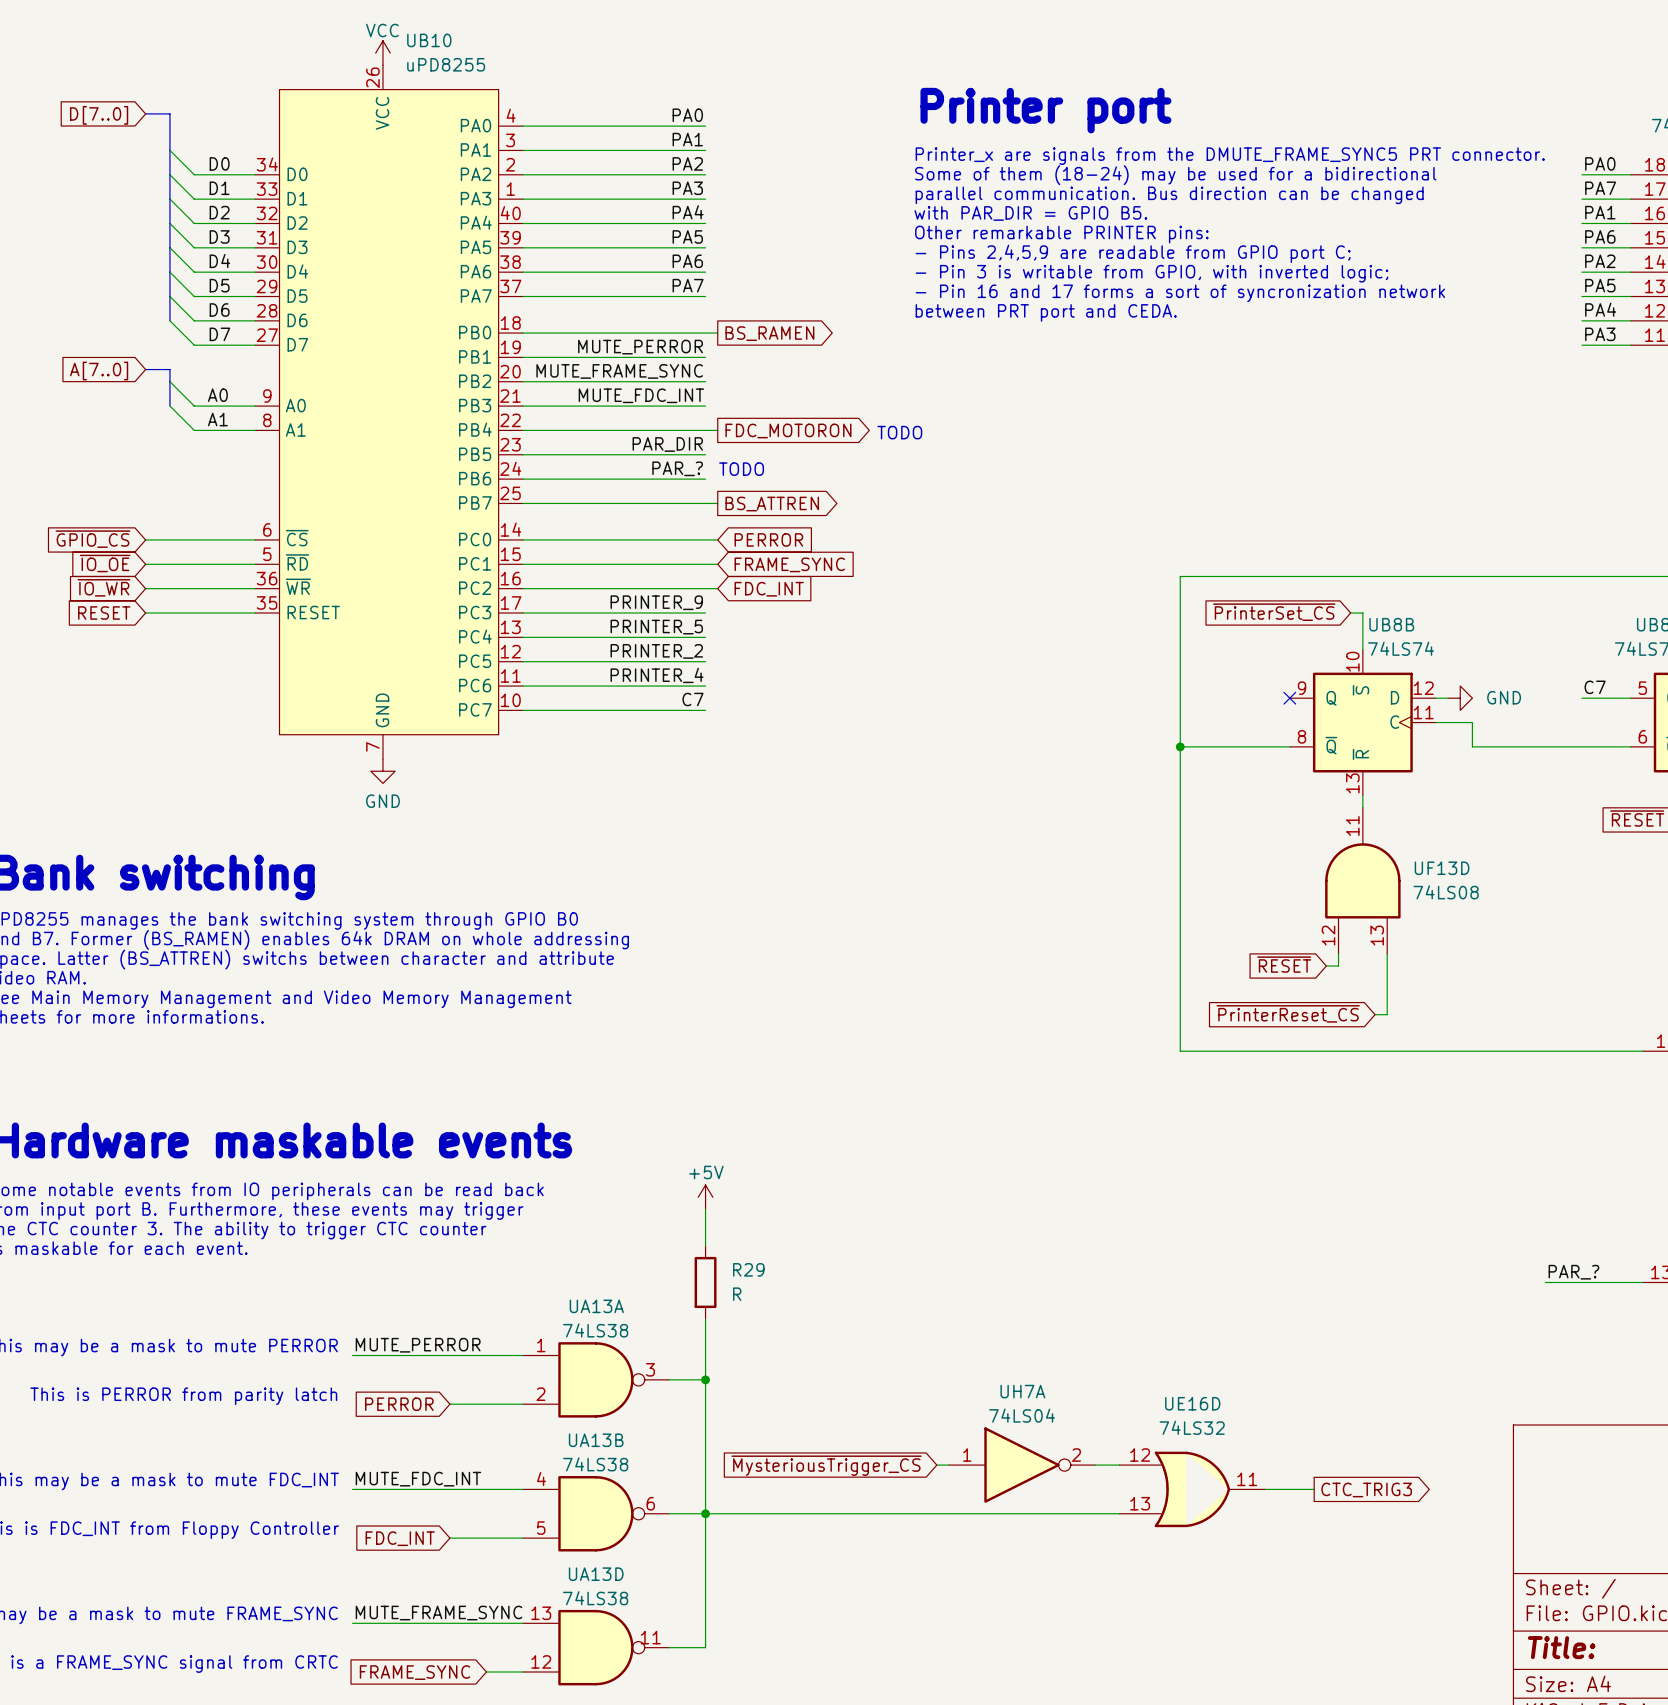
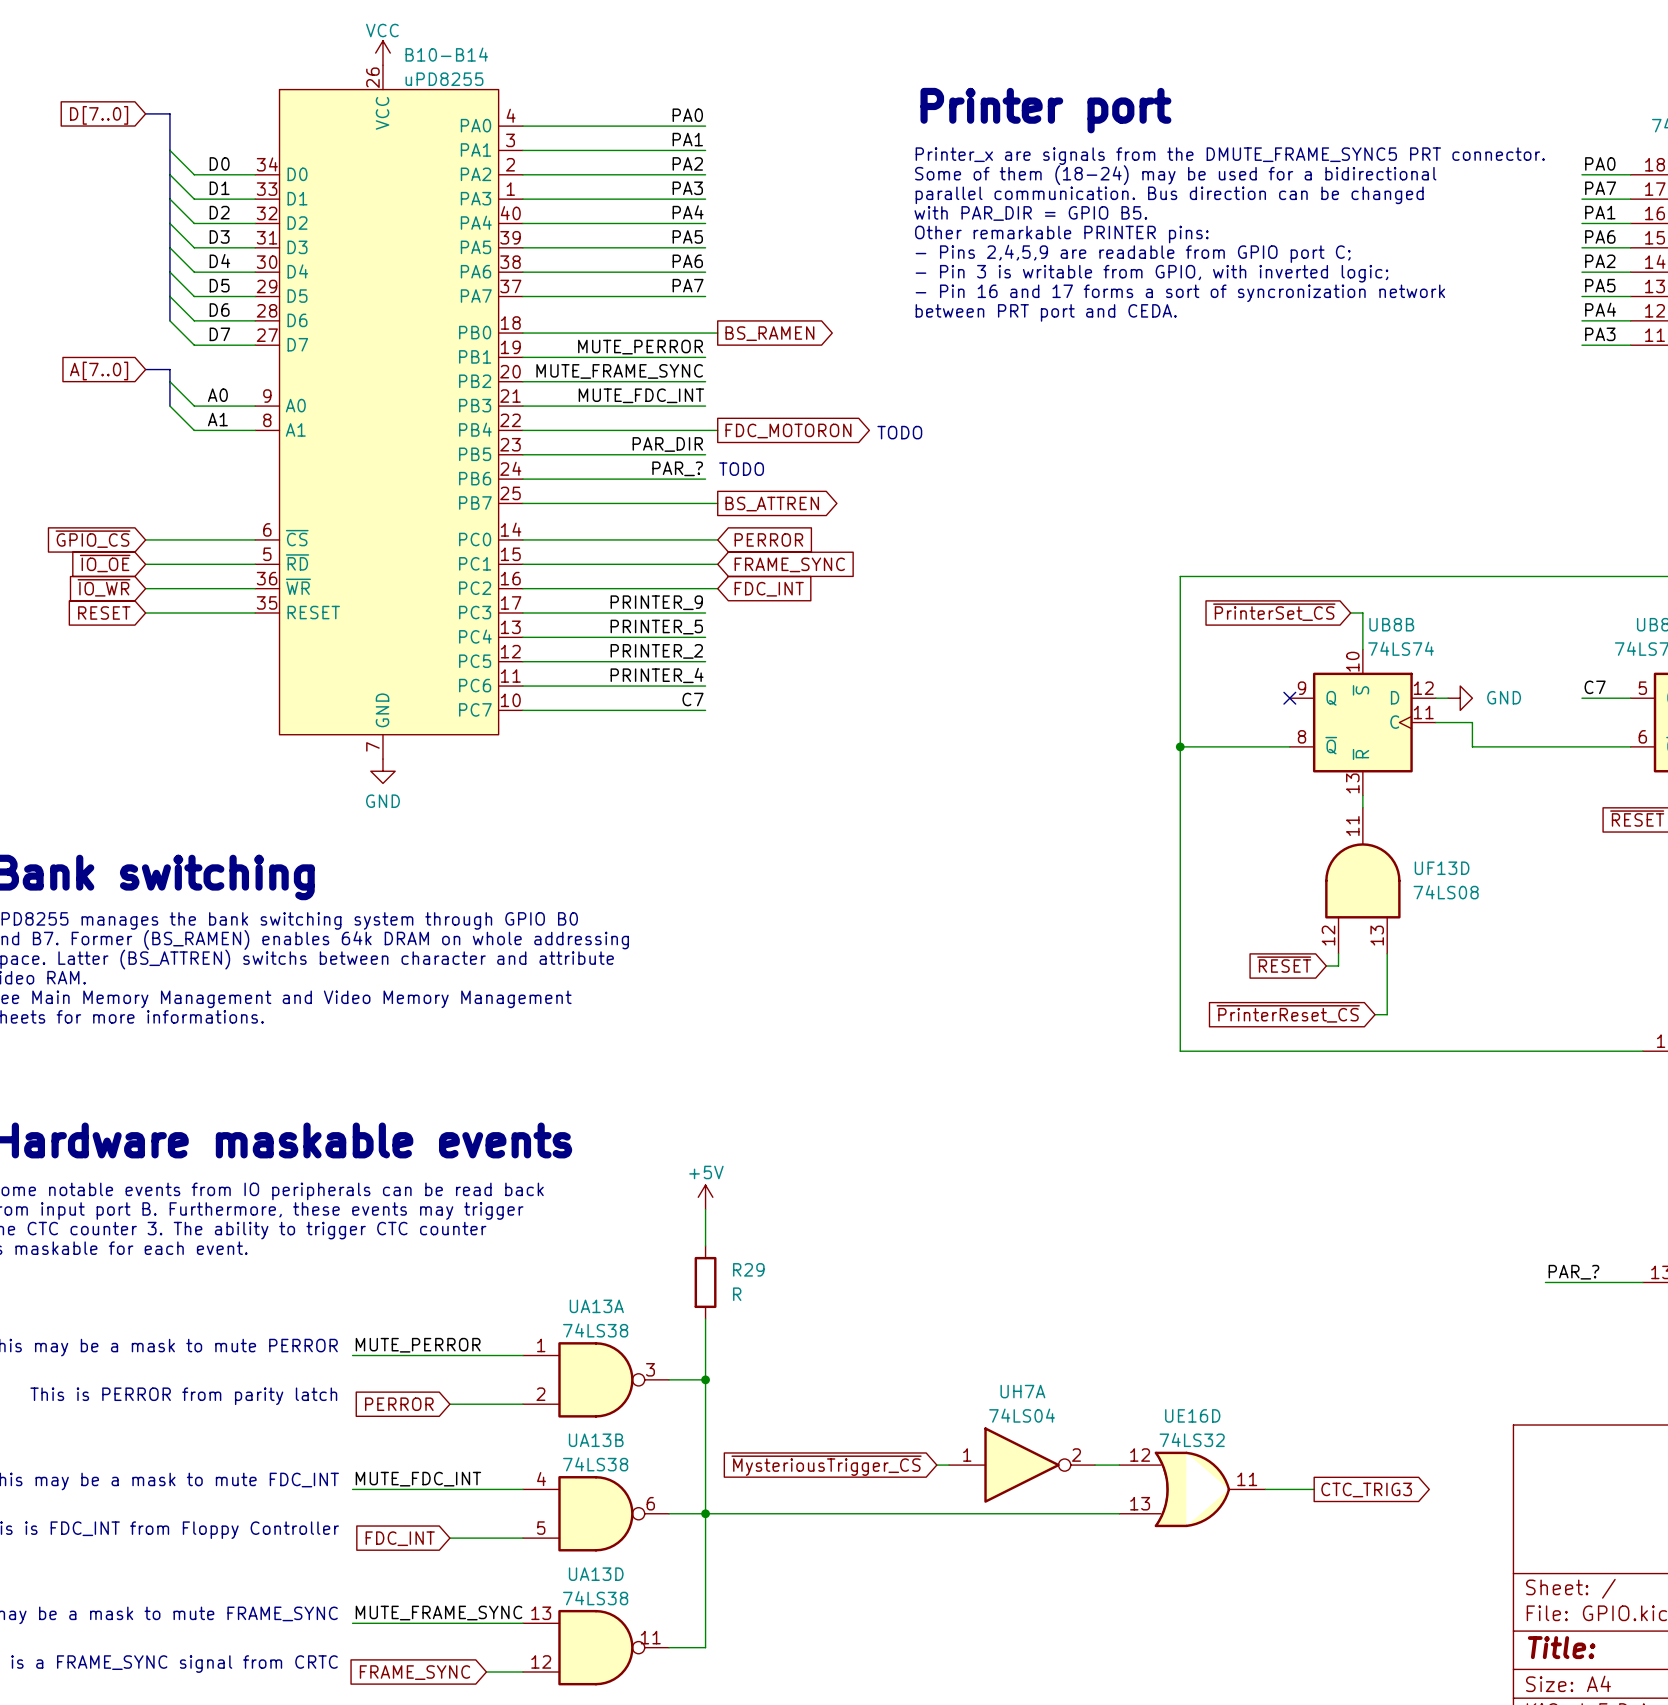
UB10 name: UB10 (429, 40) -> B10-B14 (446, 54)
UB10 value position: uPD8255 (446, 64) -> uPD8255 (444, 79)
UE16D name position: UE16D (1192, 1403) -> UE16D (1192, 1415)
UE16D value position: 74LS32 (1192, 1427) -> 74LS32 (1192, 1439)

